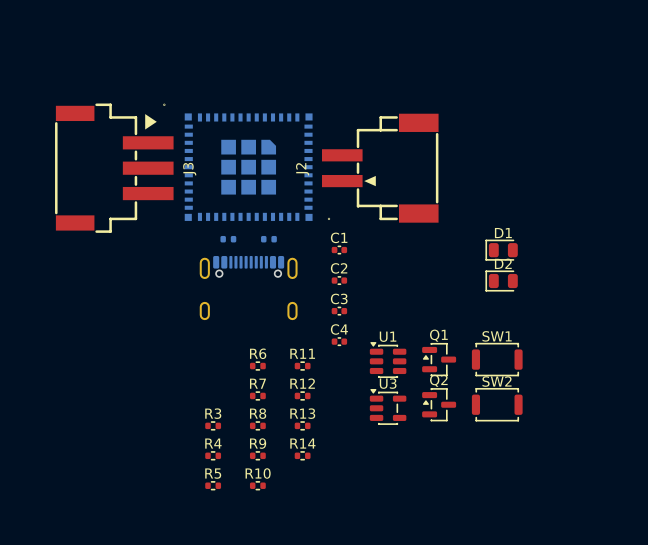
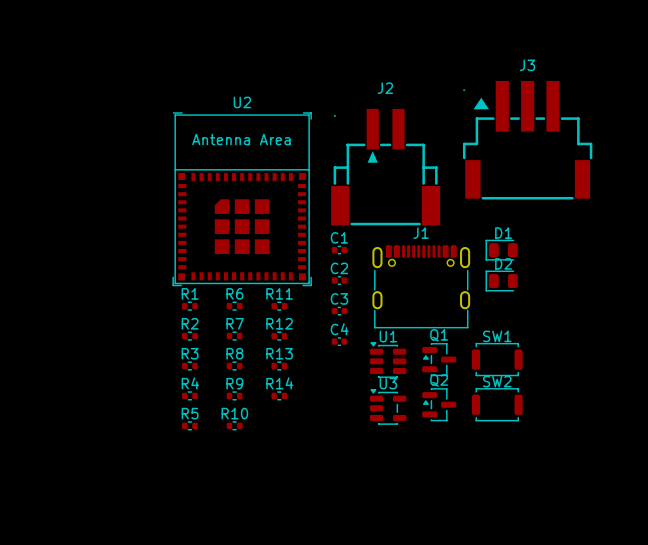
U2 side: bottom (248, 167) -> top (242, 199)
J3 rotation: 0° (114, 168) -> 90° counterclockwise (527, 140)
J3 position: (114, 168) -> (527, 140)
J2 rotation: 0° (380, 168) -> 90° clockwise (385, 167)
R2 side: bottom (228, 239) -> top (189, 336)
R1 side: bottom (268, 239) -> top (189, 306)
J1 side: bottom (248, 288) -> top (421, 286)
R6 position: (257, 366) -> (234, 306)
R11 position: (302, 366) -> (279, 306)
R7 position: (257, 395) -> (234, 336)
R12 position: (302, 395) -> (279, 336)
R3 position: (213, 425) -> (189, 365)
R8 position: (257, 425) -> (234, 365)
R13 position: (302, 425) -> (279, 365)
R4 position: (213, 455) -> (189, 395)
R9 position: (257, 455) -> (234, 395)
R14 position: (302, 455) -> (279, 395)
R5 position: (213, 485) -> (189, 425)
R10 position: (257, 485) -> (234, 425)

